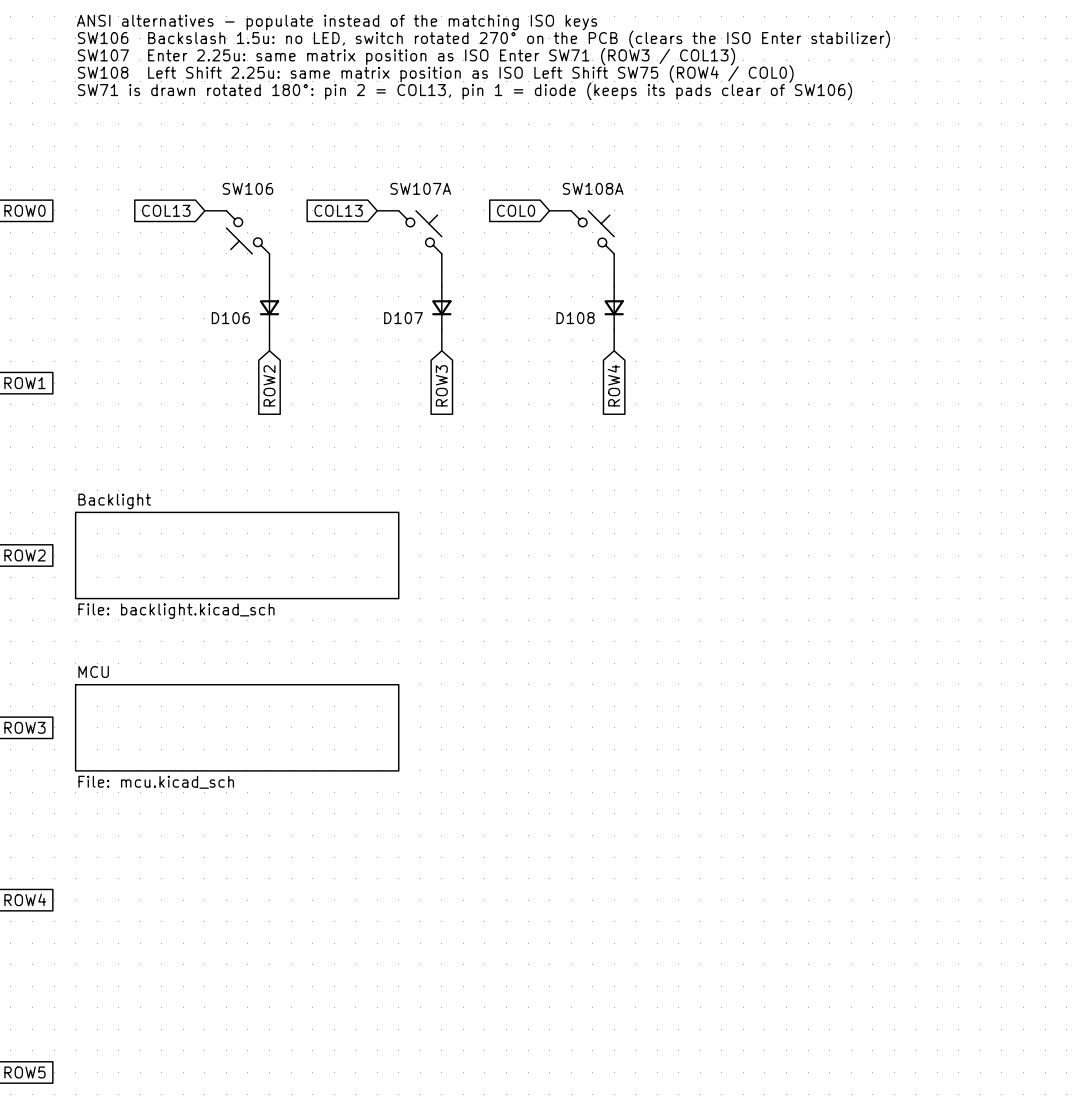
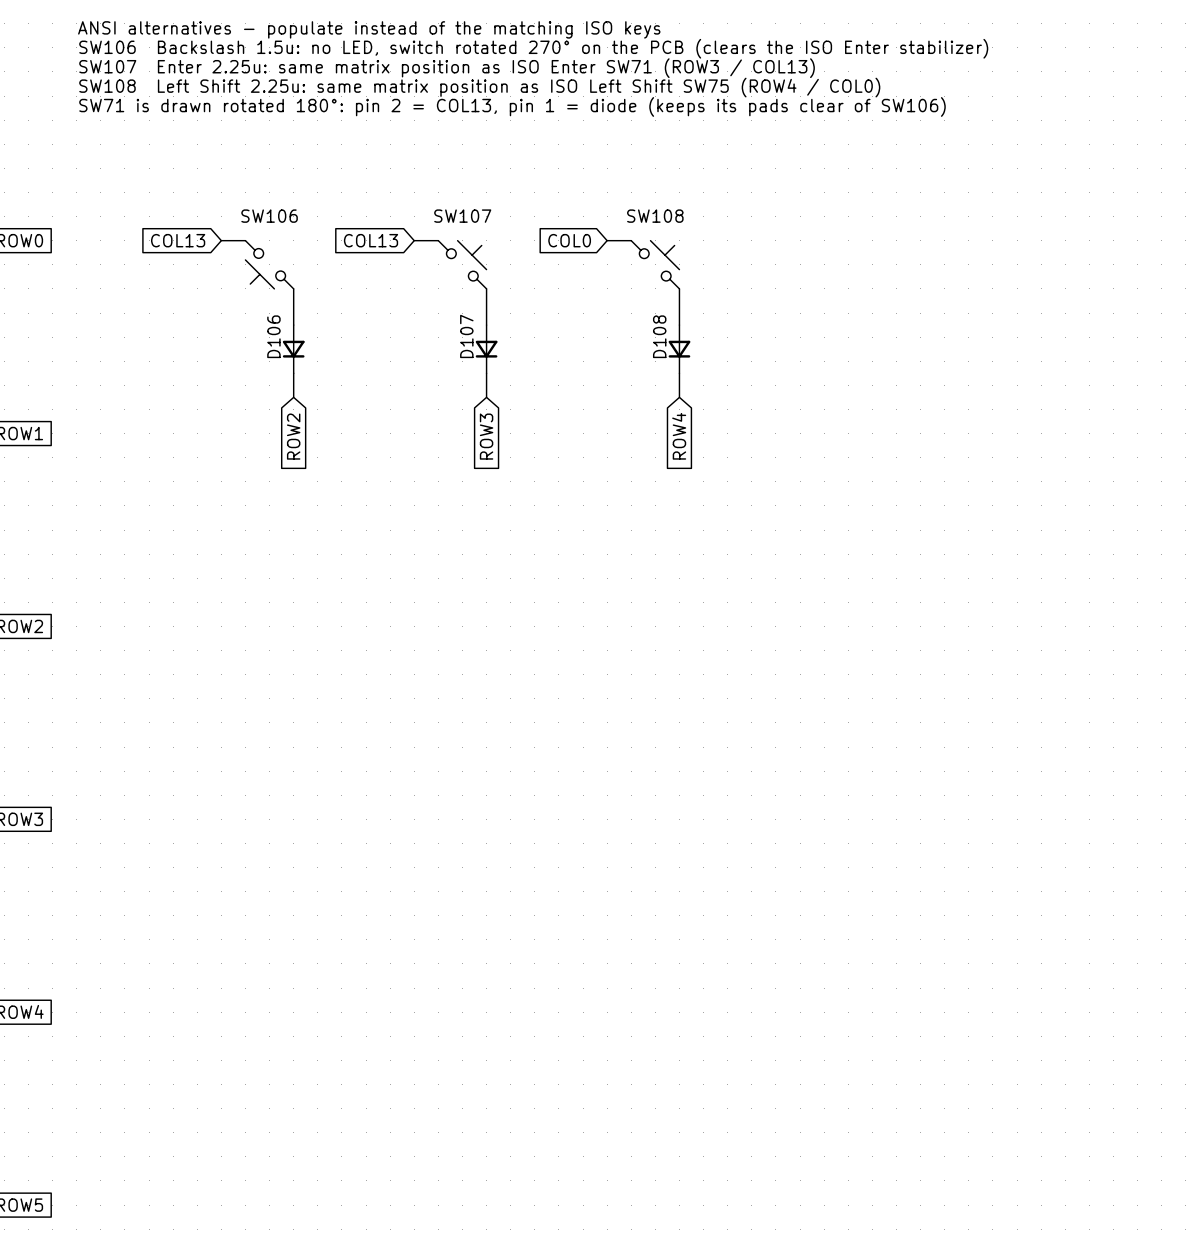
SW107A name: SW107A (420, 188) -> SW107 (462, 216)
SW108A name: SW108A (593, 188) -> SW108 (655, 216)
D106 name rotation: 0° (230, 318) -> 90° counterclockwise (273, 336)
D107 name rotation: 0° (403, 318) -> 90° counterclockwise (466, 336)
D108 name rotation: 0° (575, 318) -> 90° counterclockwise (659, 336)
sheet Backlight: File: backlight.kicad_sch (237, 555) -> none
sheet MCU: File: mcu.kicad_sch (237, 727) -> none

